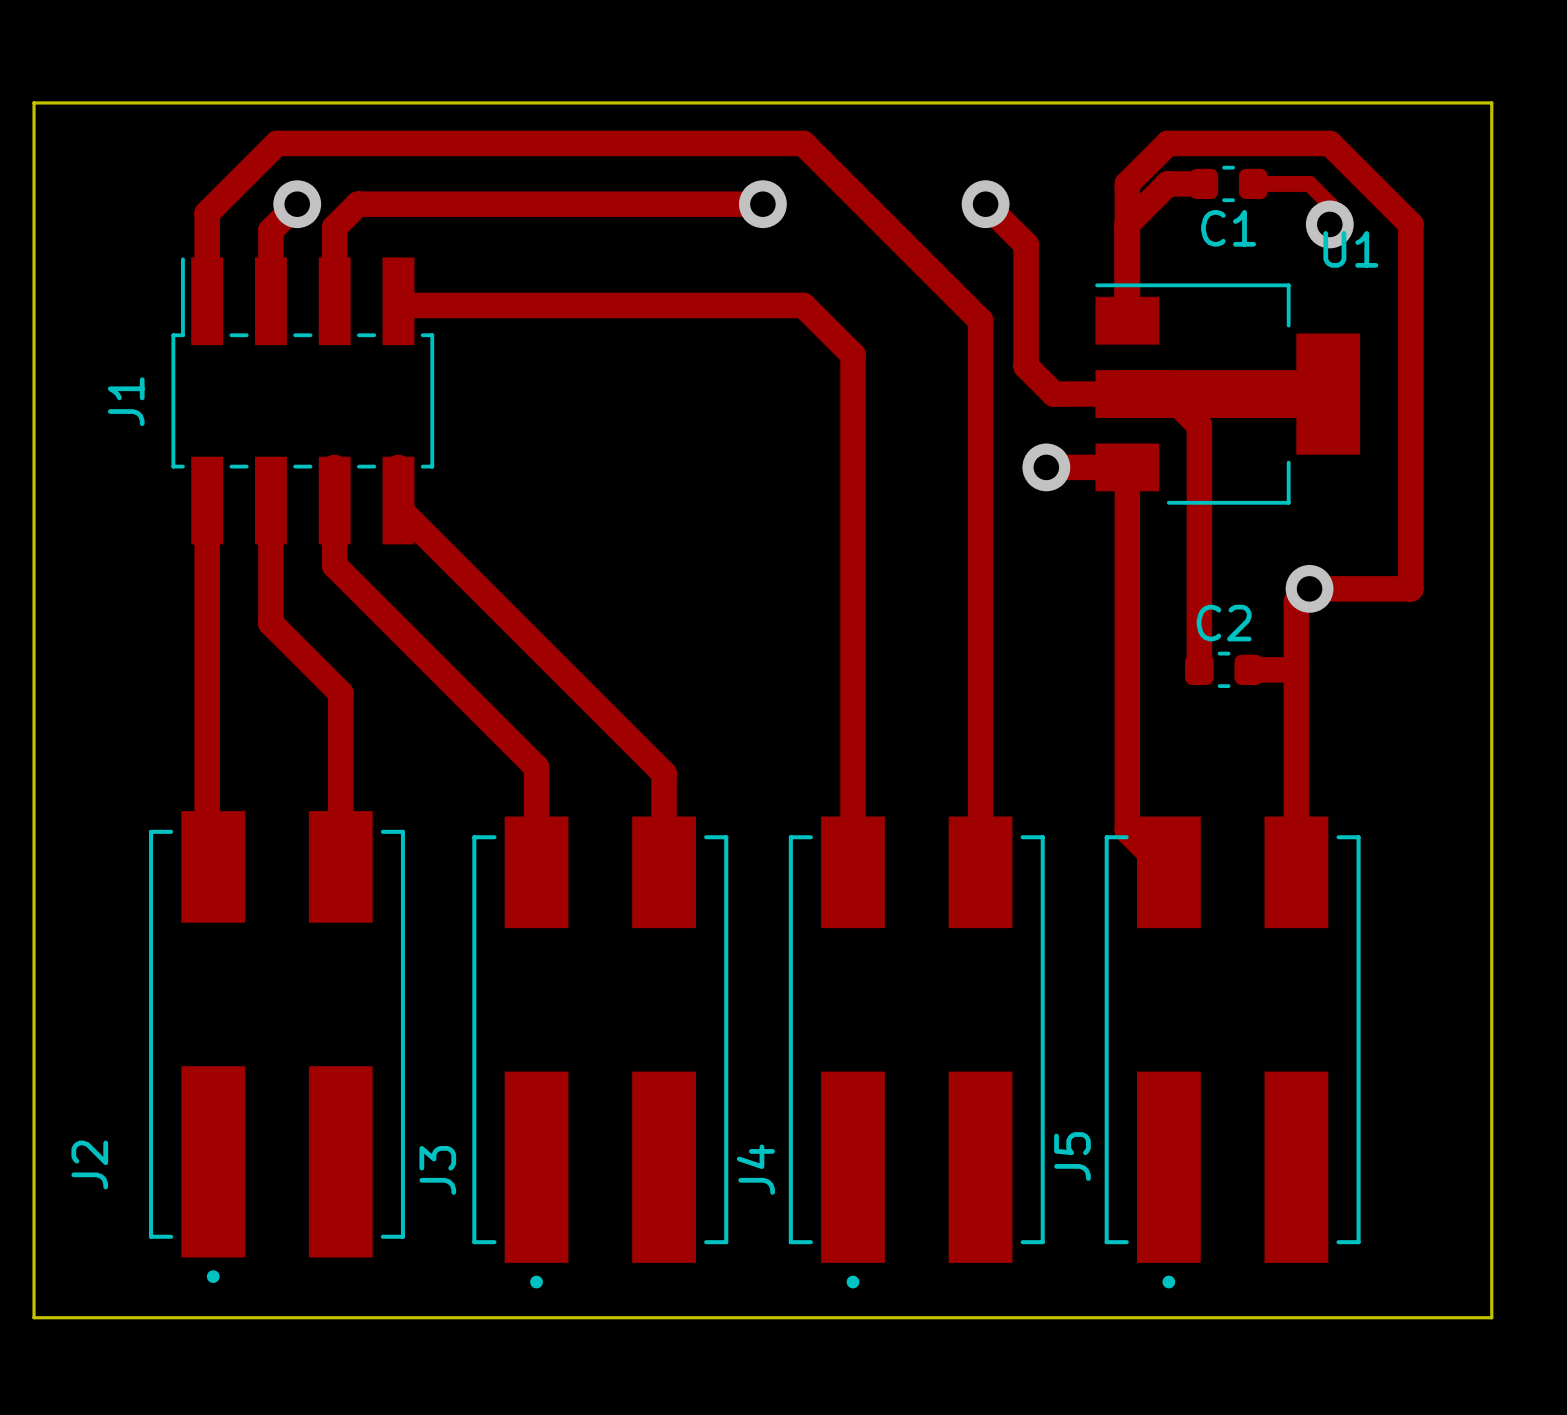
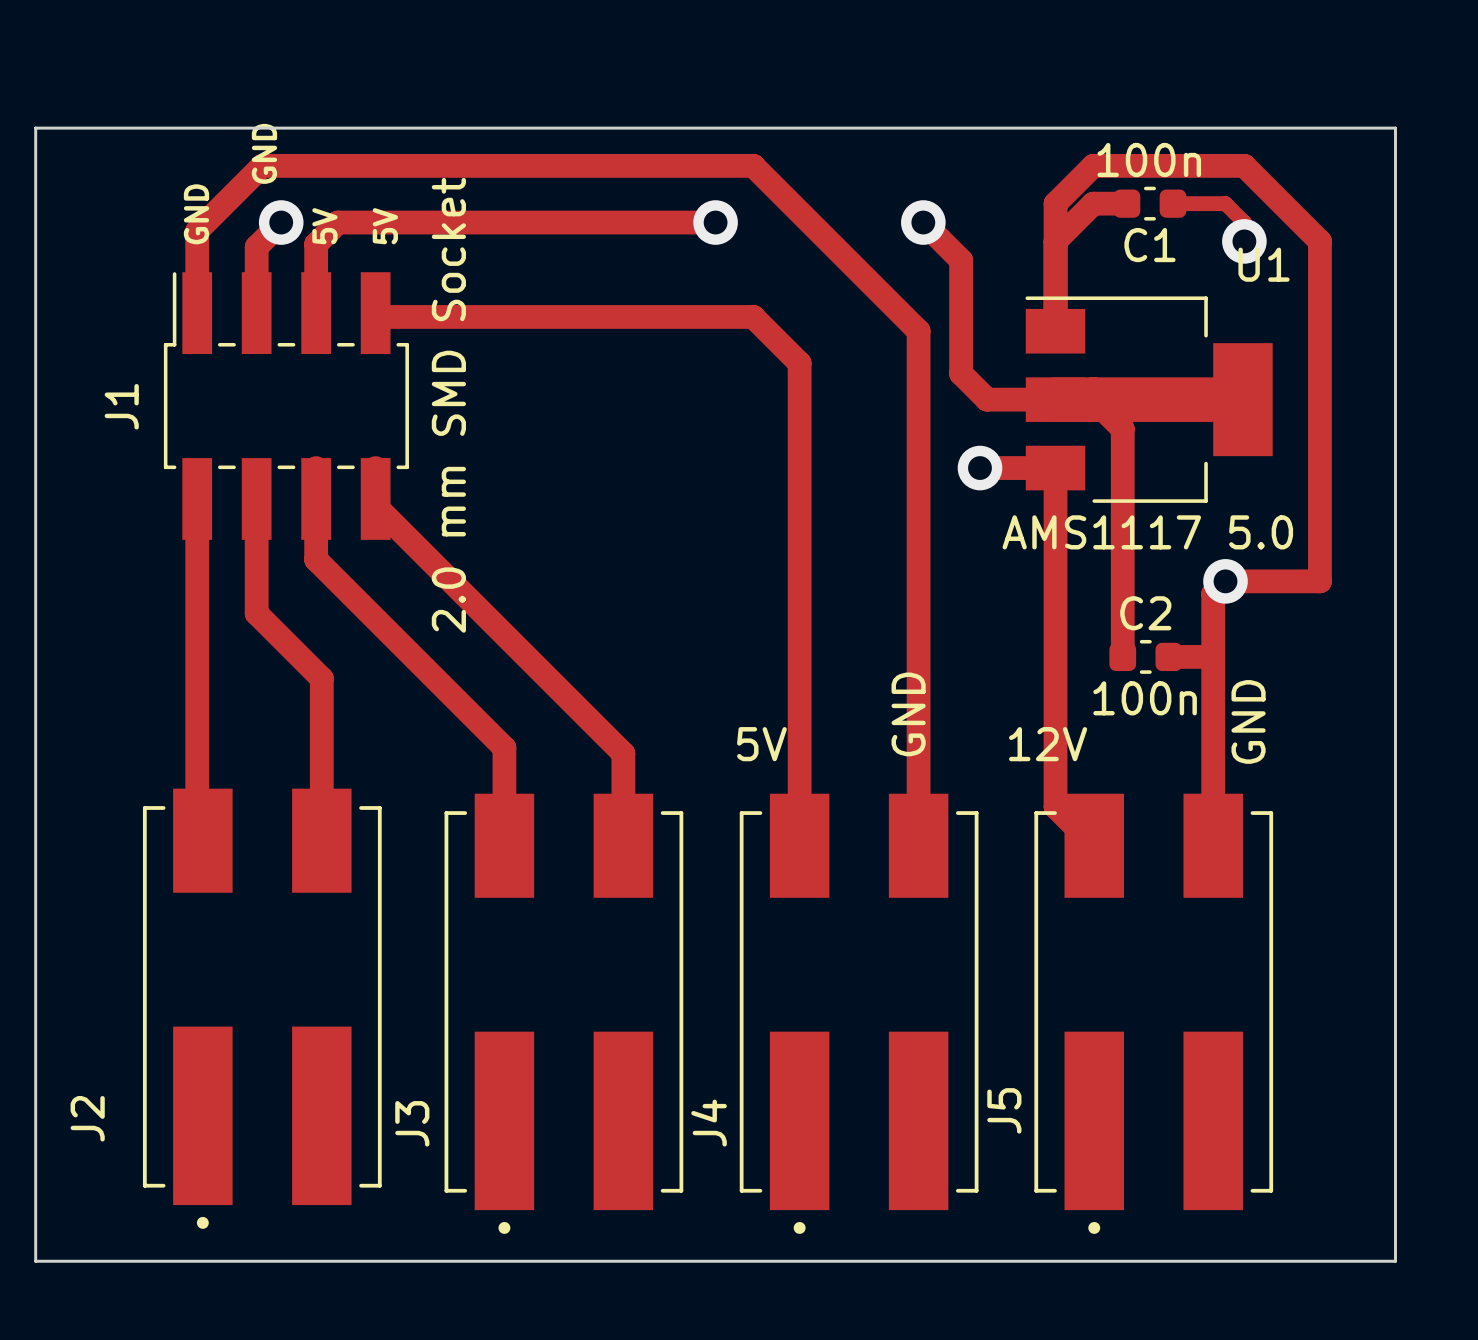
text: none -> GND (264, 153)
C1 value: none -> 100n (1149, 160)
text: none -> GND (196, 214)
text: none -> 5V (324, 226)
text: none -> 5V (385, 226)
J1 value: none -> 2.0 mm SMD Socket (448, 405)
U1 value: none -> AMS1117 5.0 (1147, 532)
C2 value: none -> 100n (1145, 698)
text: none -> GND (908, 714)
text: none -> GND (1248, 721)
text: none -> 5V (761, 744)
text: none -> 12V (1048, 744)

